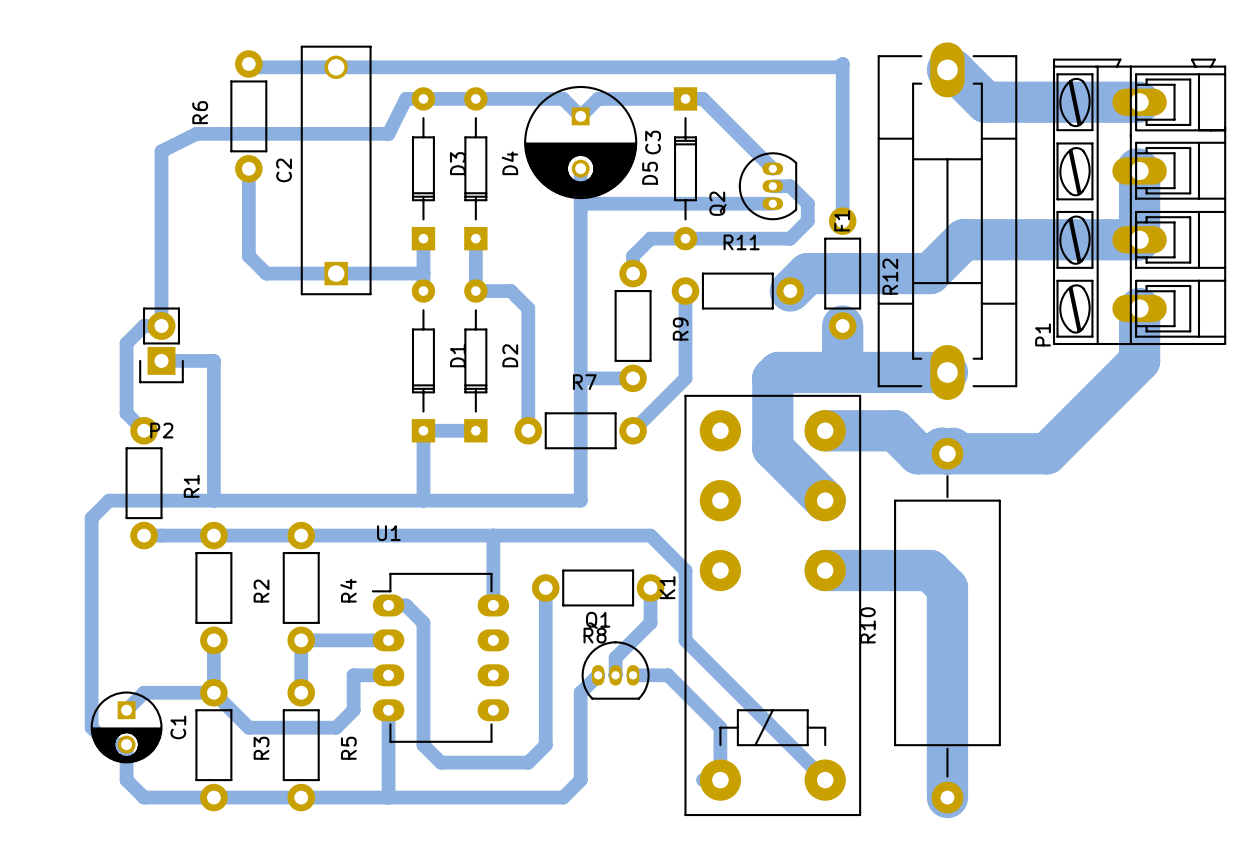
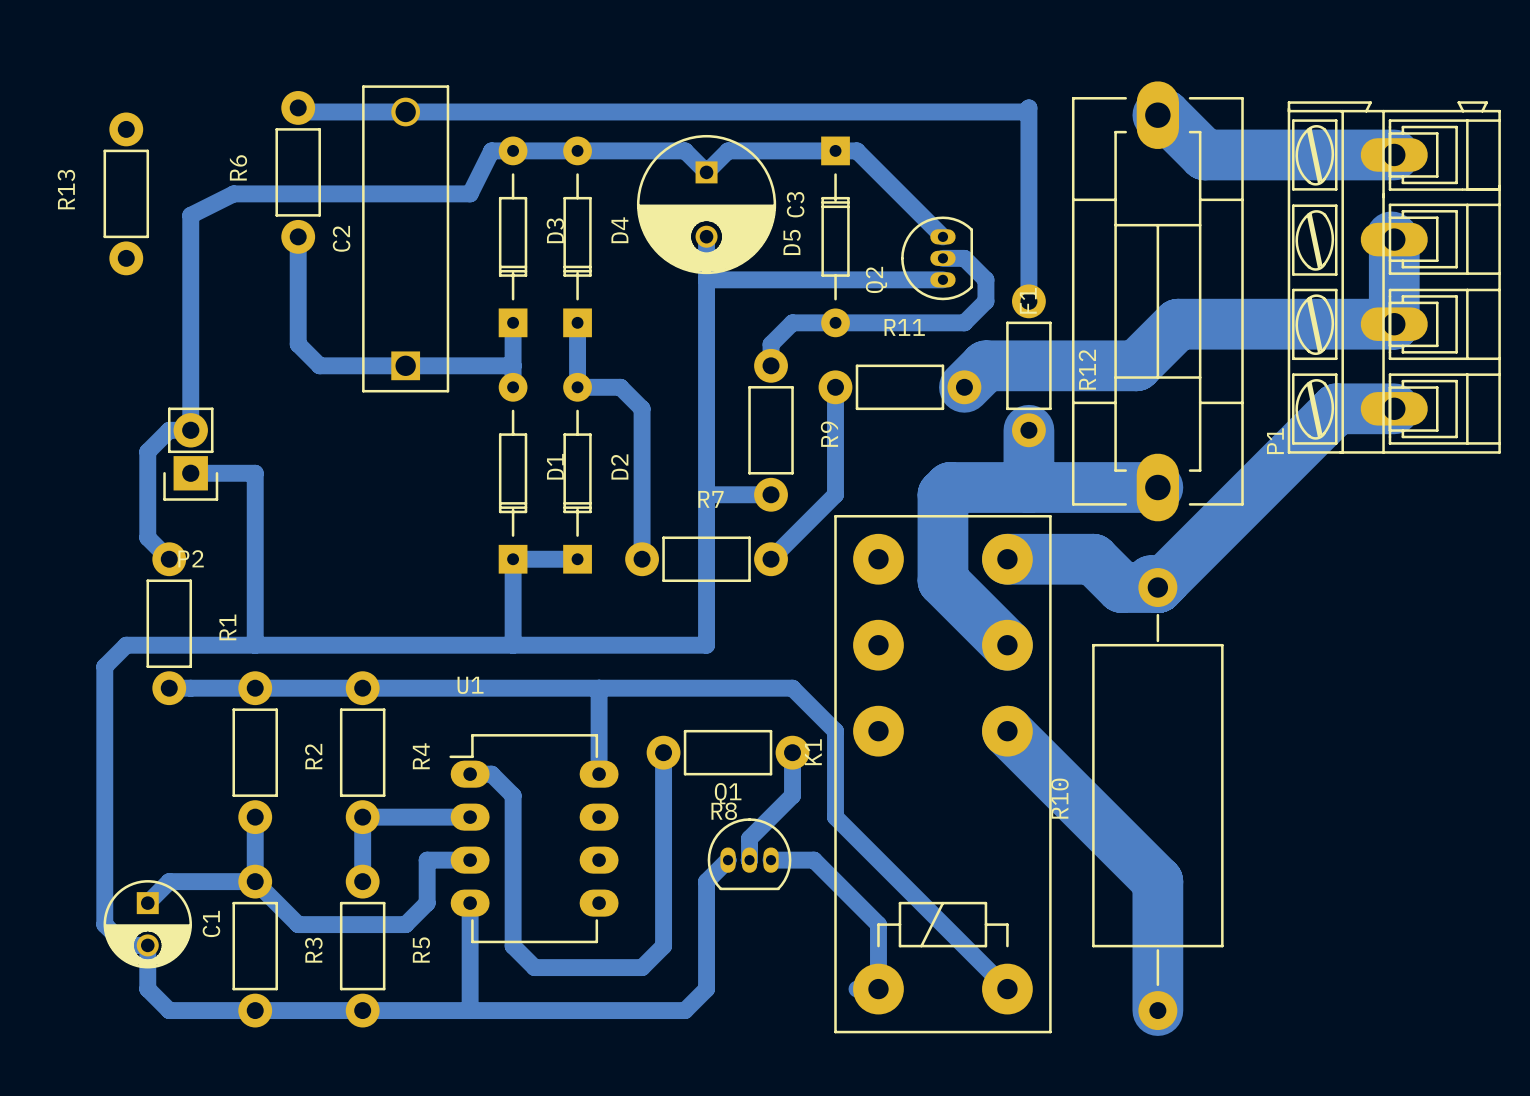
R13: none -> (126, 193)
bottom track: (1139, 308) (1139, 360) (1046, 453) (947, 453) -> (1394, 408) (1336, 408) (1164, 580)
bottom track: (825, 570) (930, 570) (947, 587) (947, 692) -> (1007, 731) (1157, 881)

